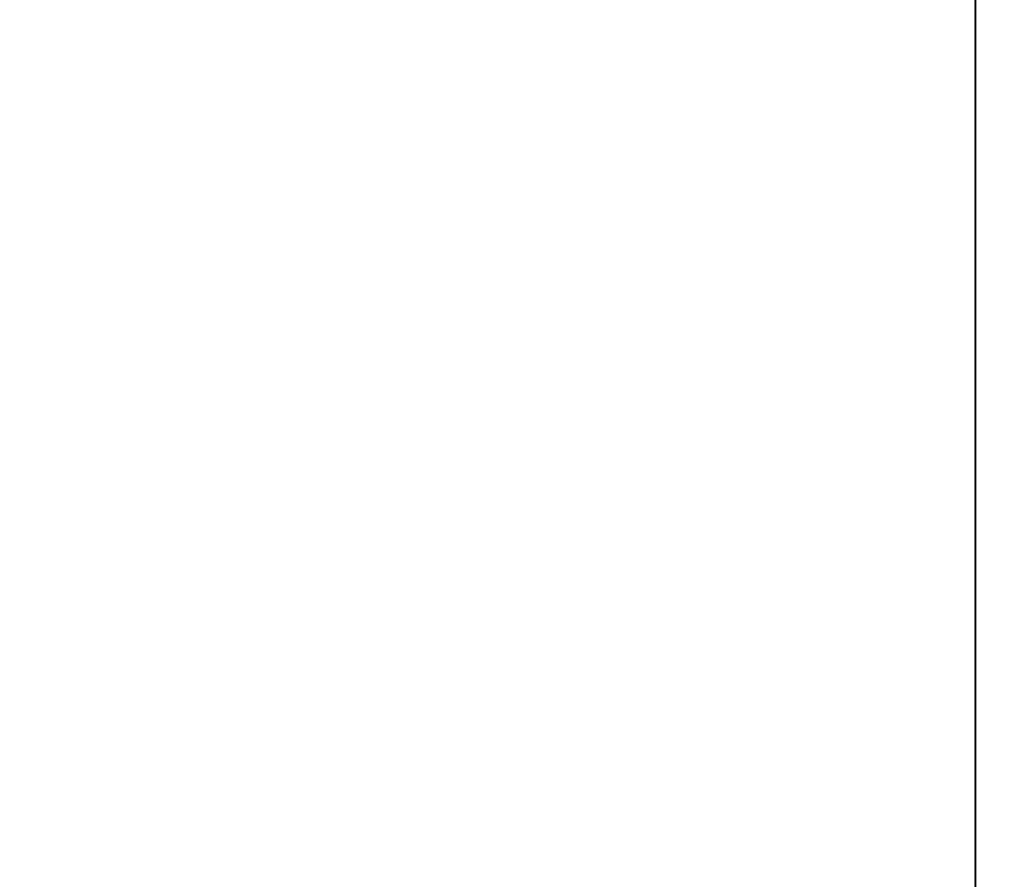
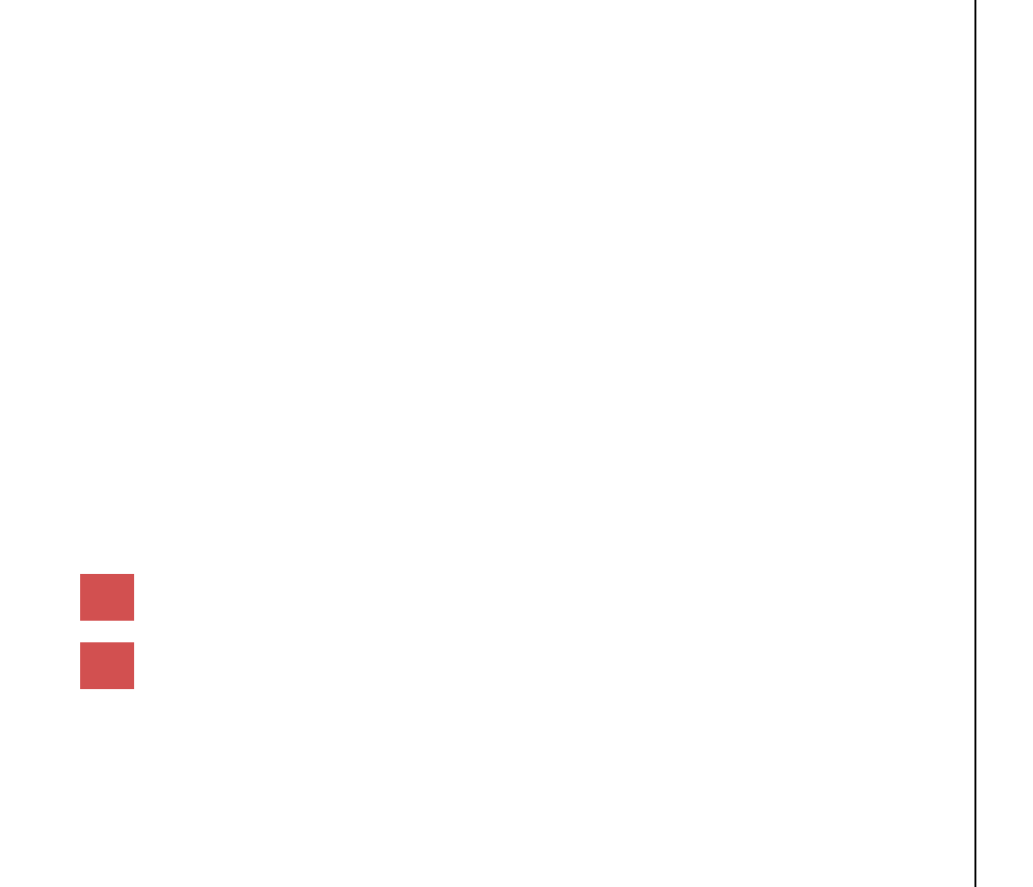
part: none -> (107, 631)

